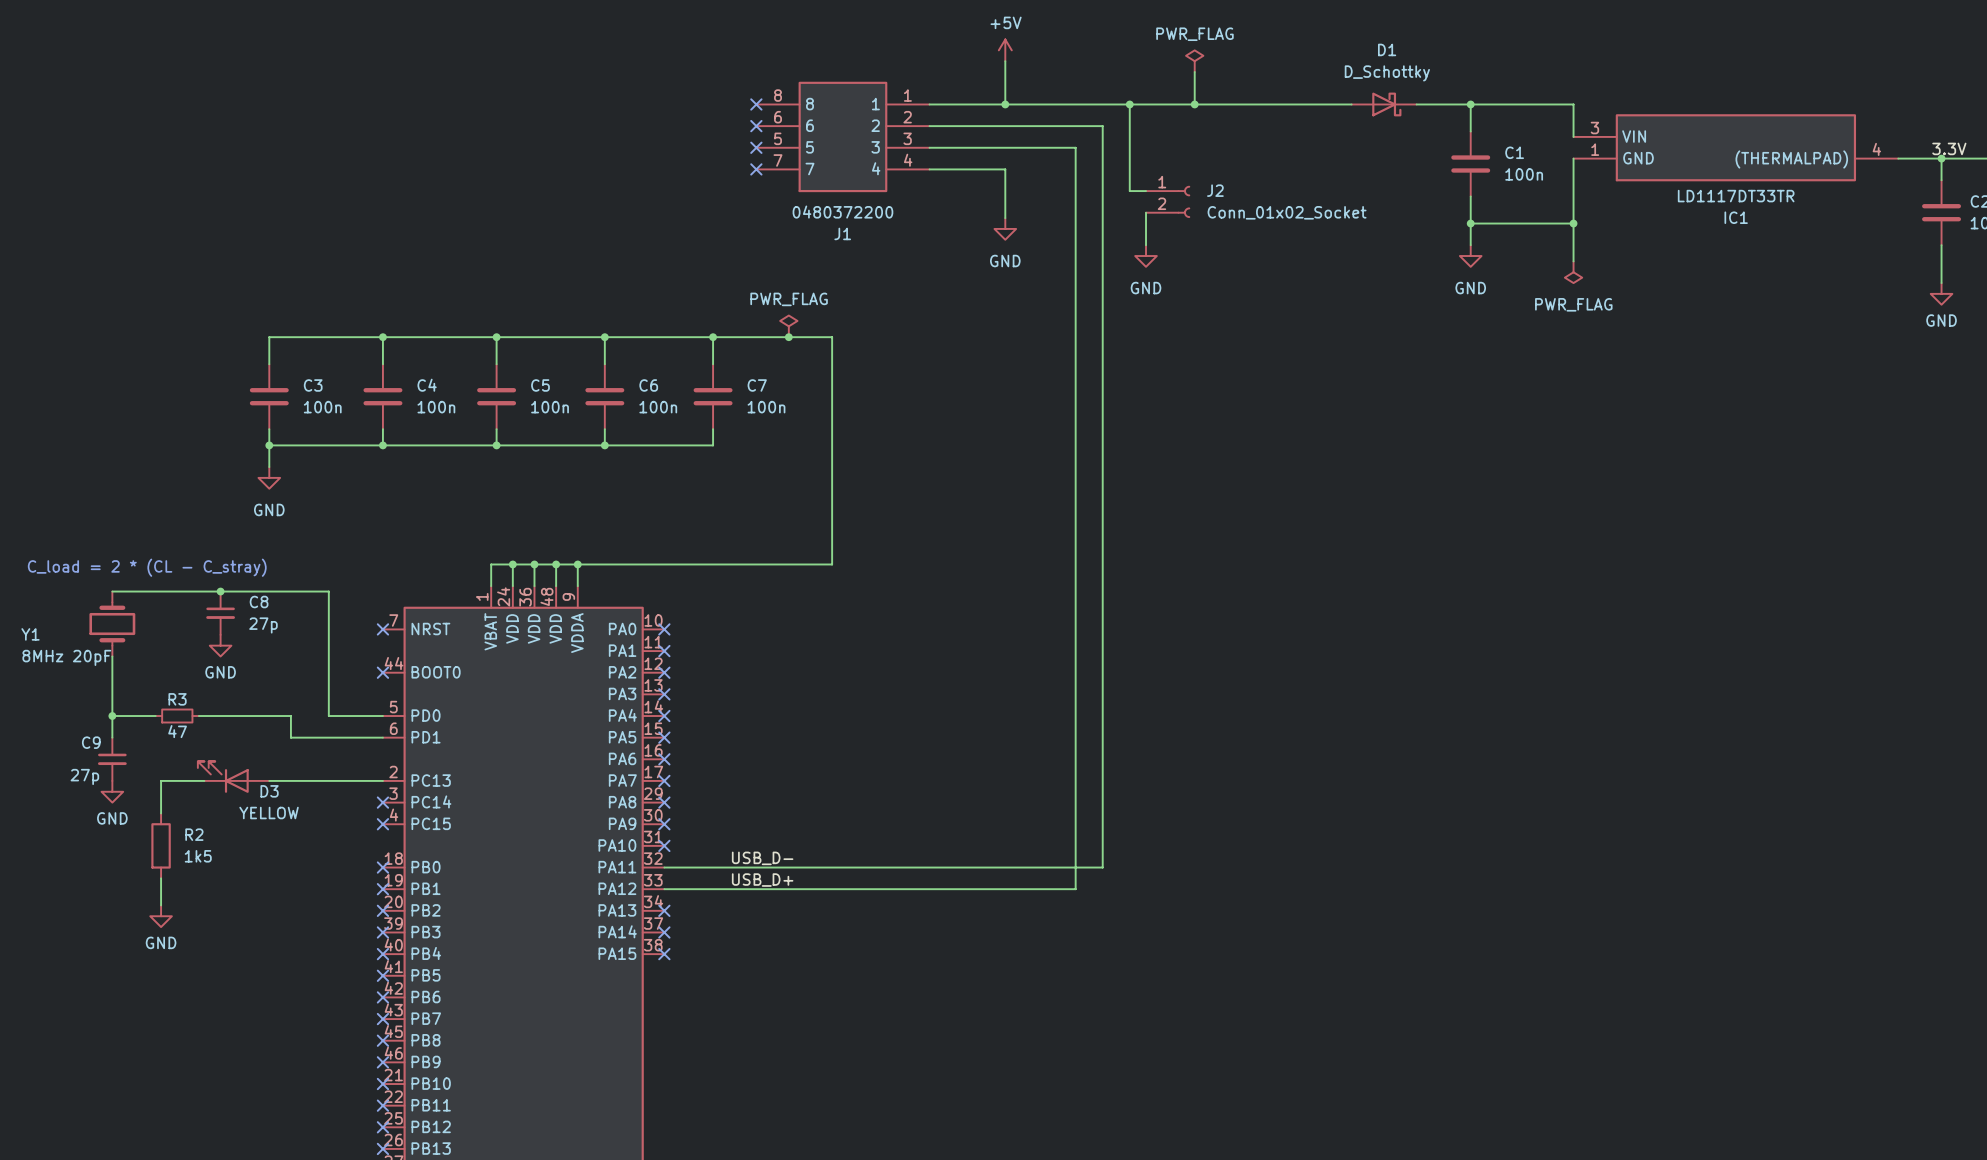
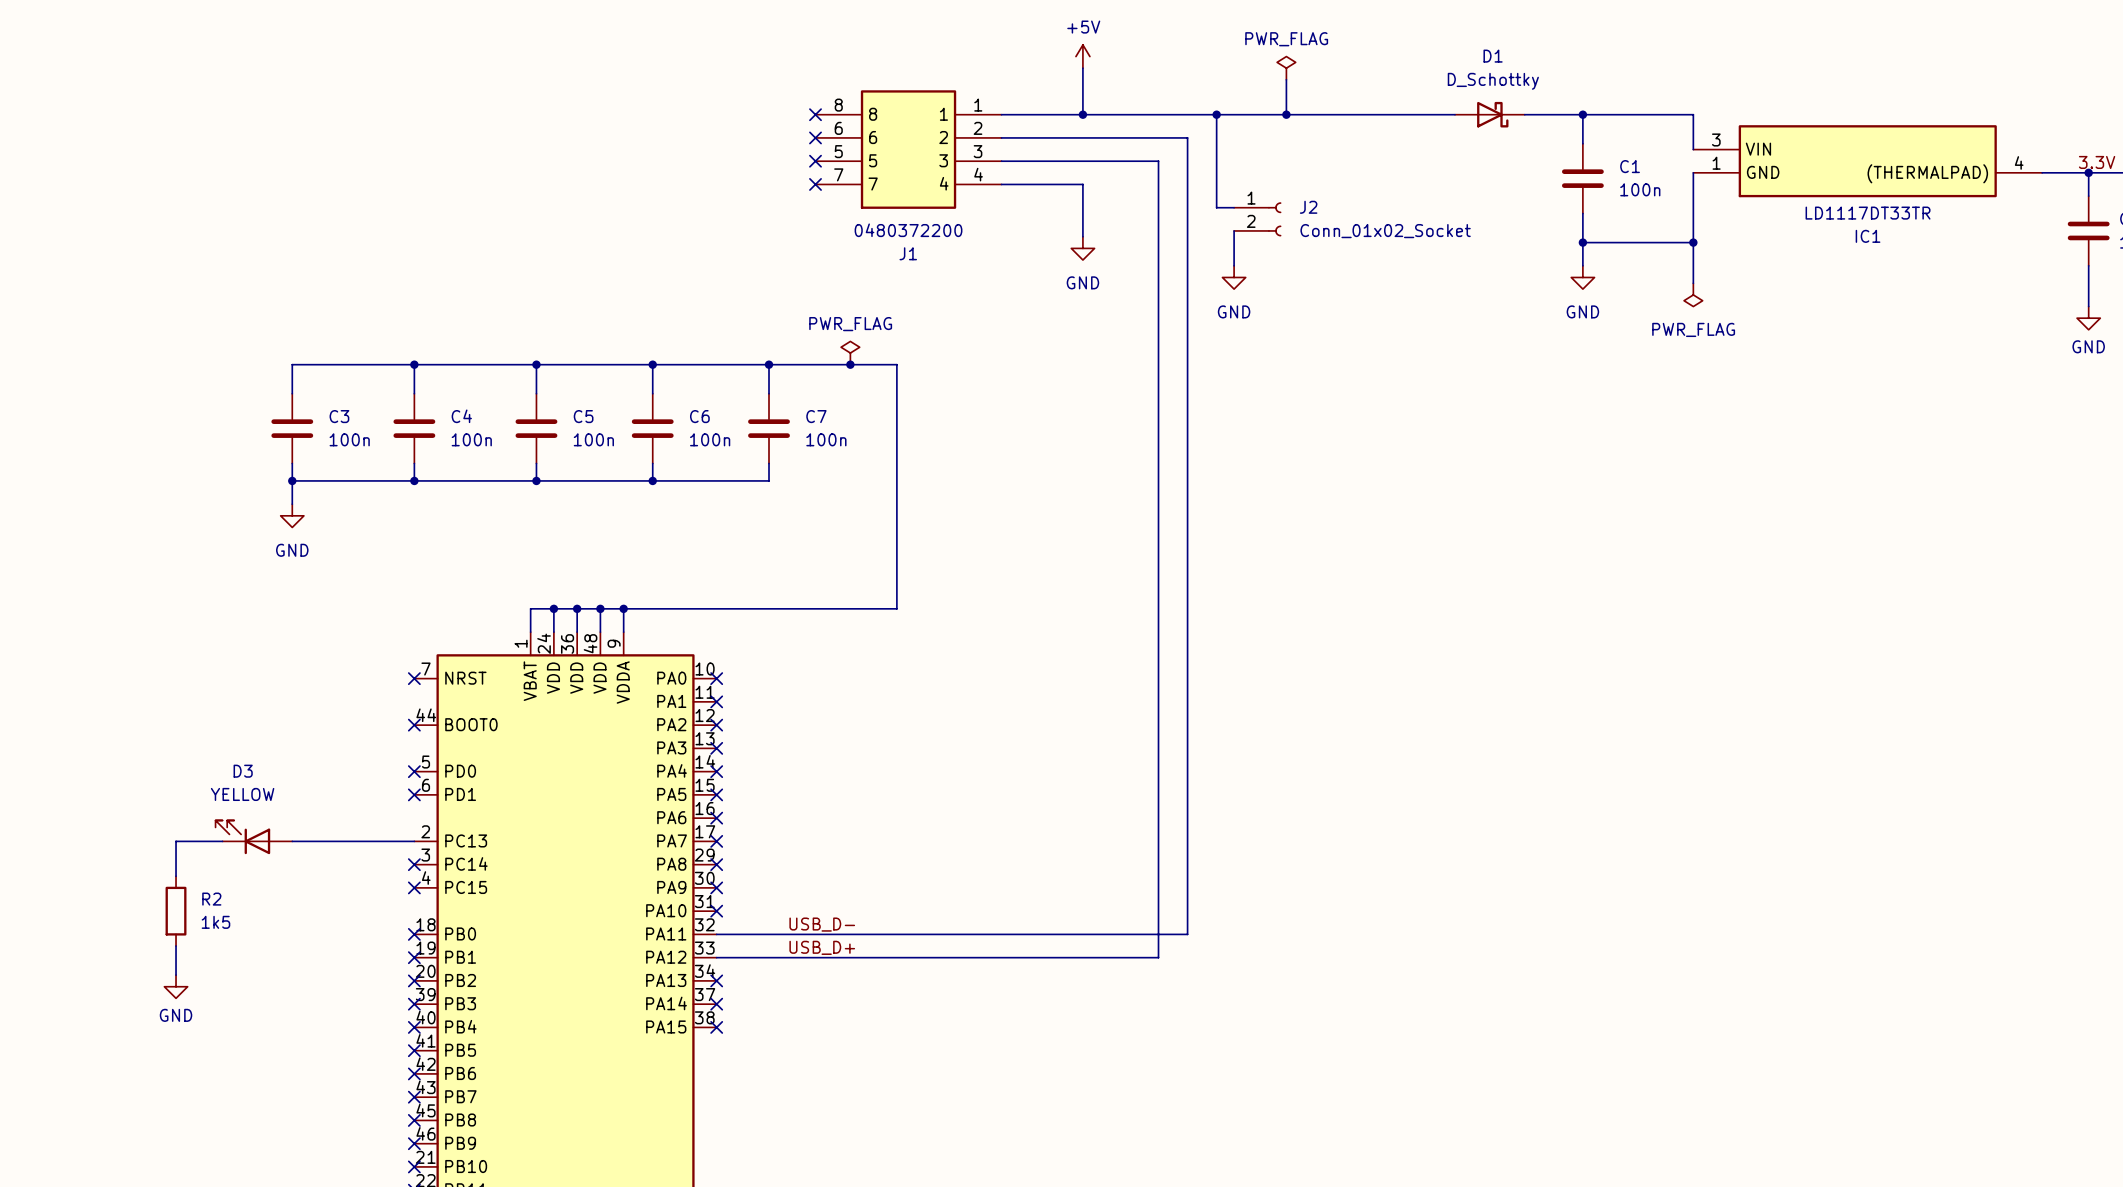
text: C_load = 2 * (CL - C_stray) (147, 567) -> none
wire: (112, 591) (328, 591) (328, 716) (382, 716) -> none
junction: (220, 591) -> none
C8: 27p (220, 613) -> none
Y1: 8MHz 20pF (112, 624) -> none
power symbol: GND (220, 645) -> none
wire: (112, 656) (112, 737) -> none
wire: (112, 716) (155, 716) -> none
junction: (112, 716) -> none
R3: 47 (177, 716) -> none
wire: (198, 716) (290, 716) (290, 737) (382, 737) -> none
no-connect mark: none -> (414, 771)
no-connect mark: none -> (414, 794)
C9: 27p (112, 759) -> none
power symbol: GND (112, 791) -> none
D3 name position: D3 (269, 791) -> D3 (243, 771)
D3 value position: YELLOW (269, 813) -> YELLOW (242, 794)

